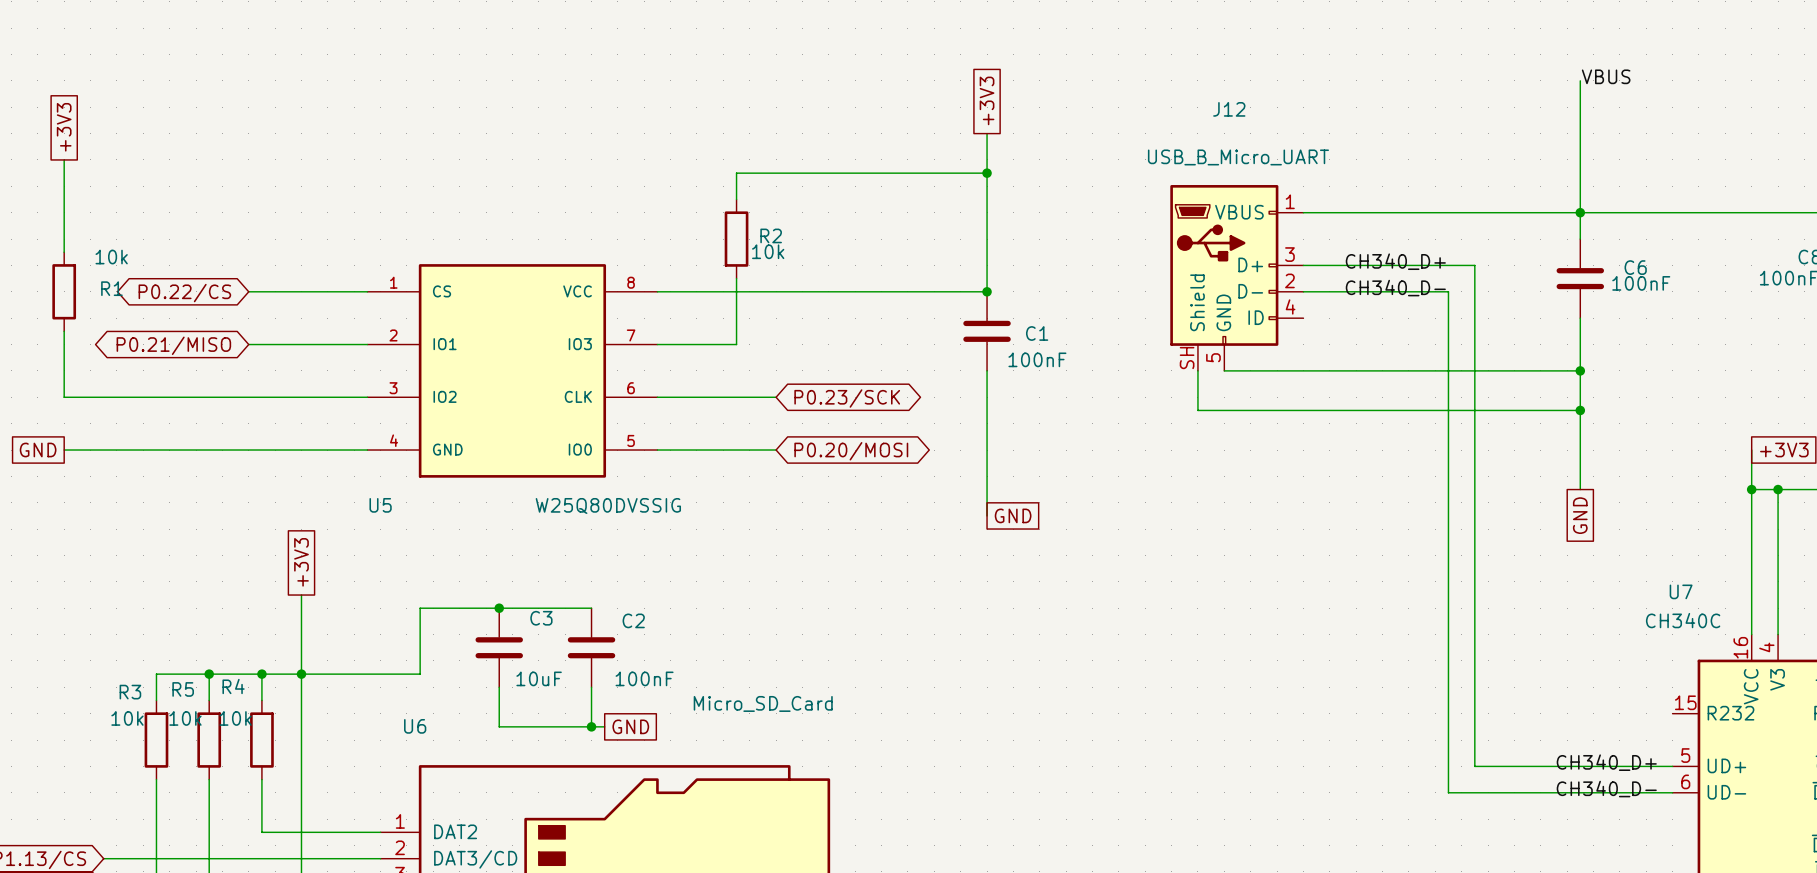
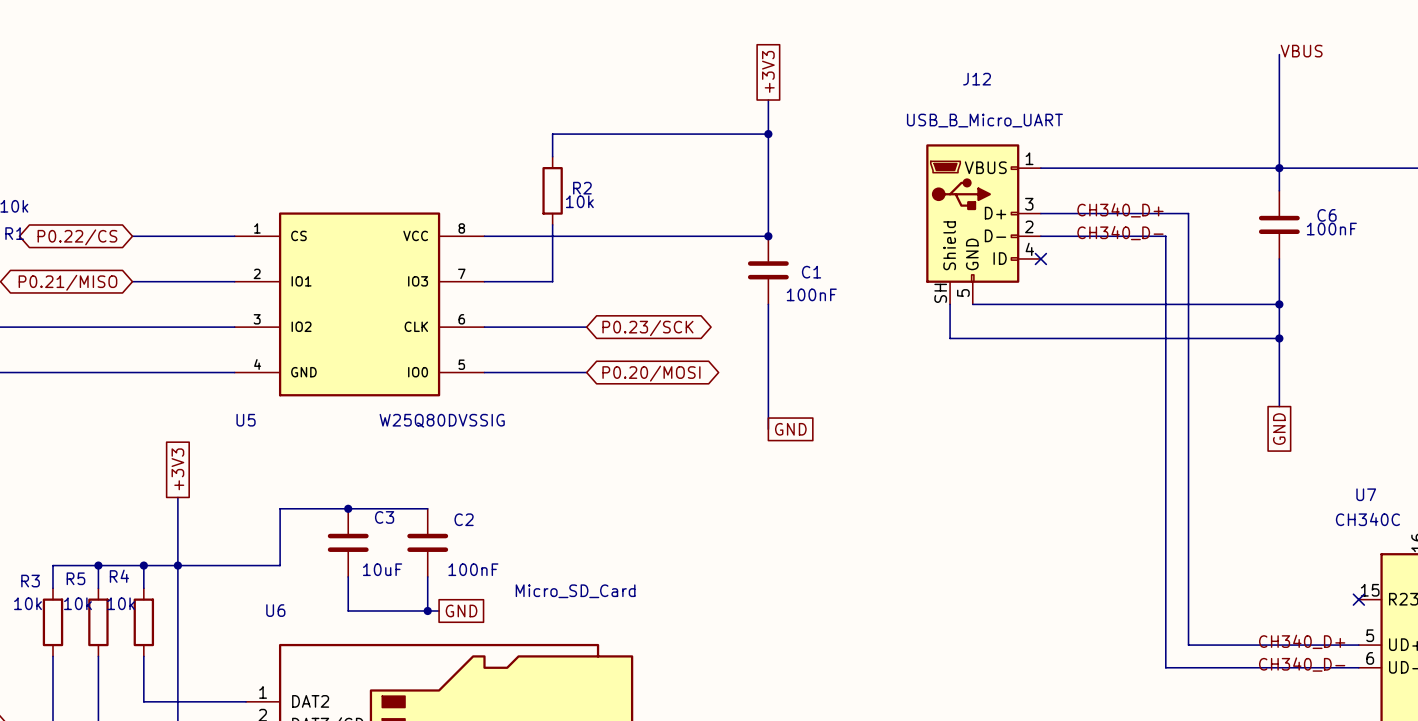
no-connect mark: none -> (1040, 258)
no-connect mark: none -> (1358, 599)

